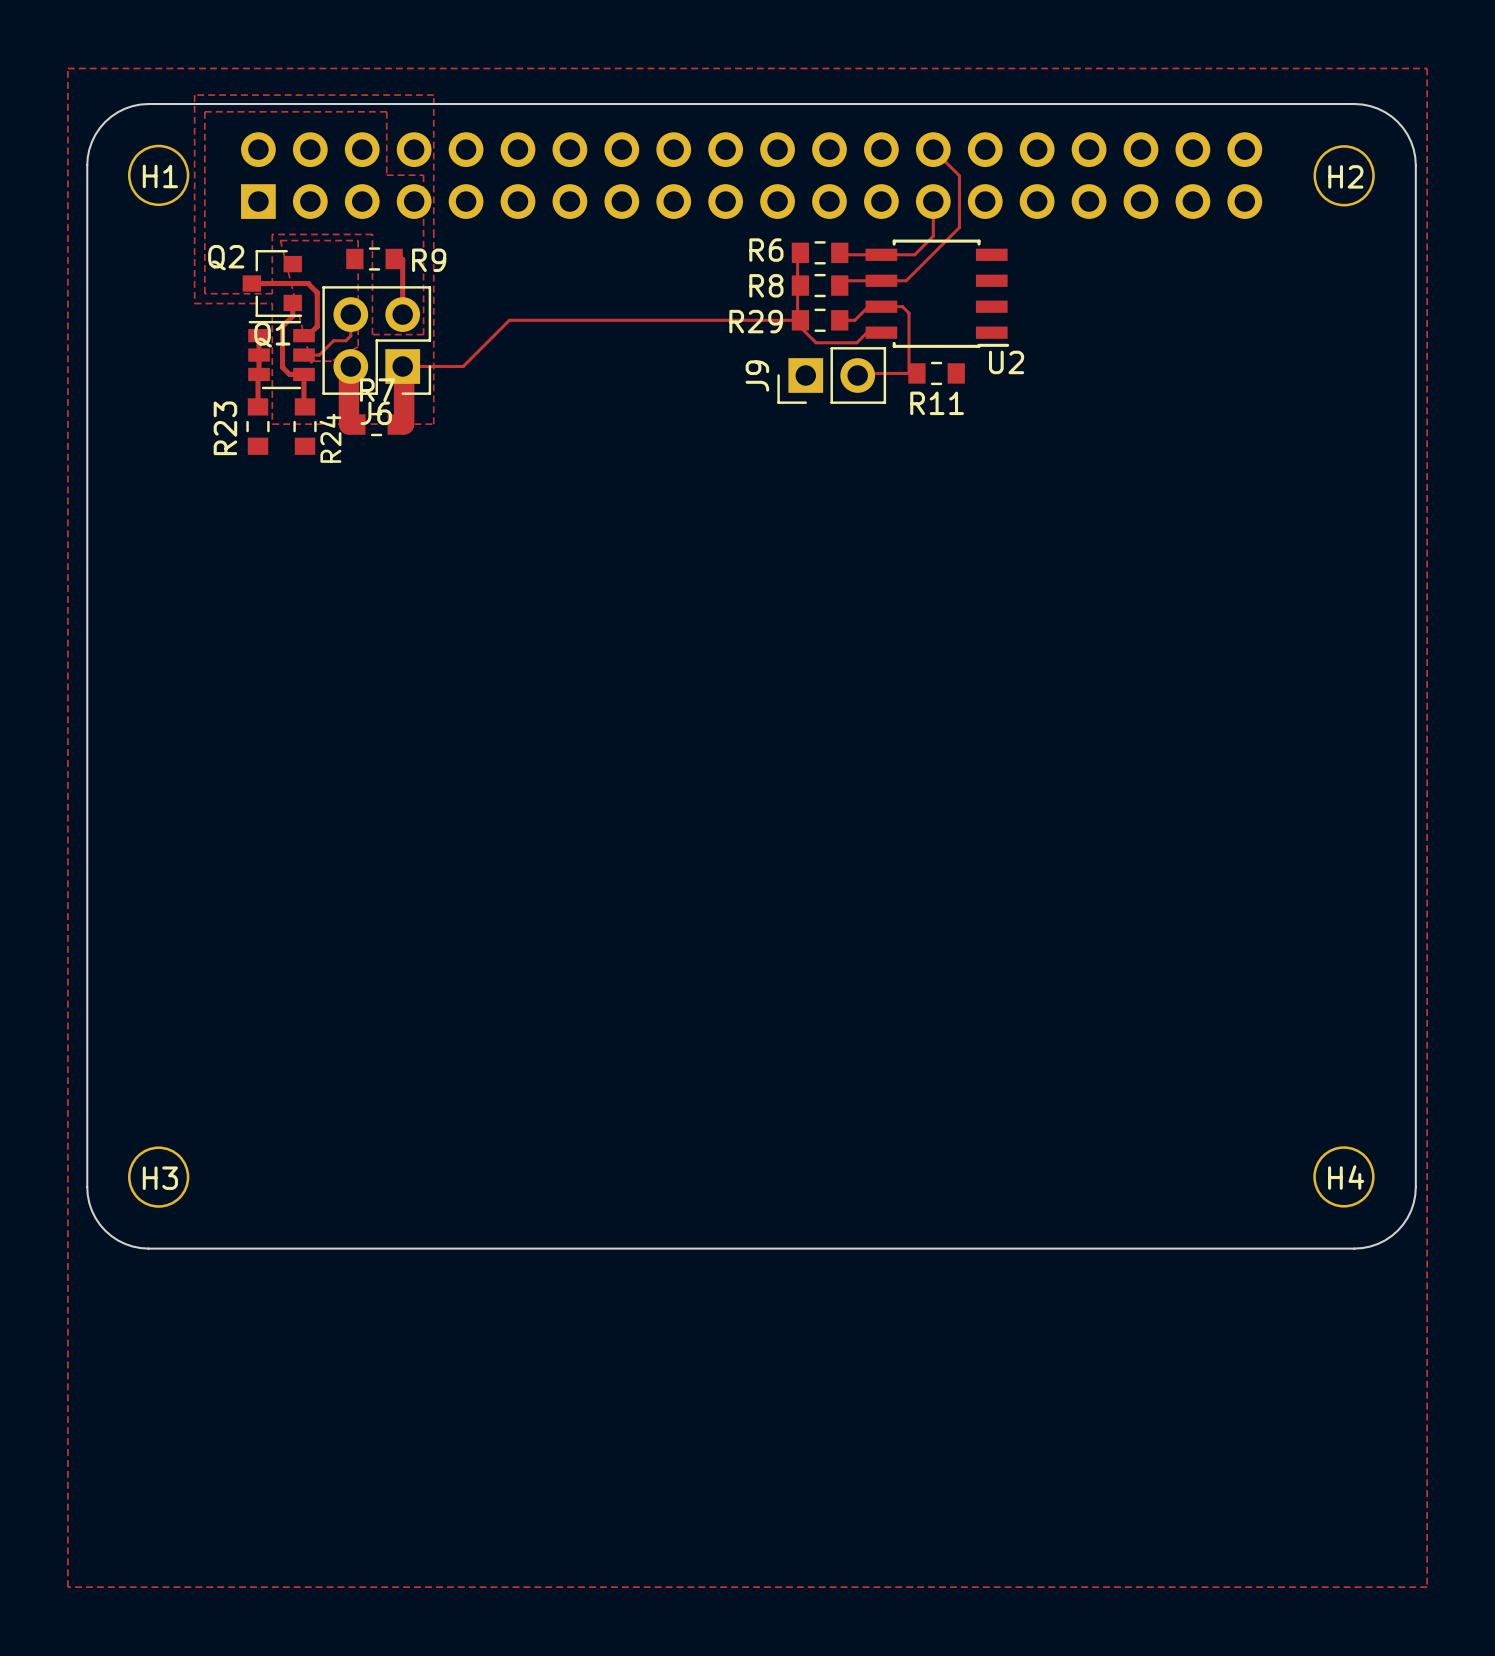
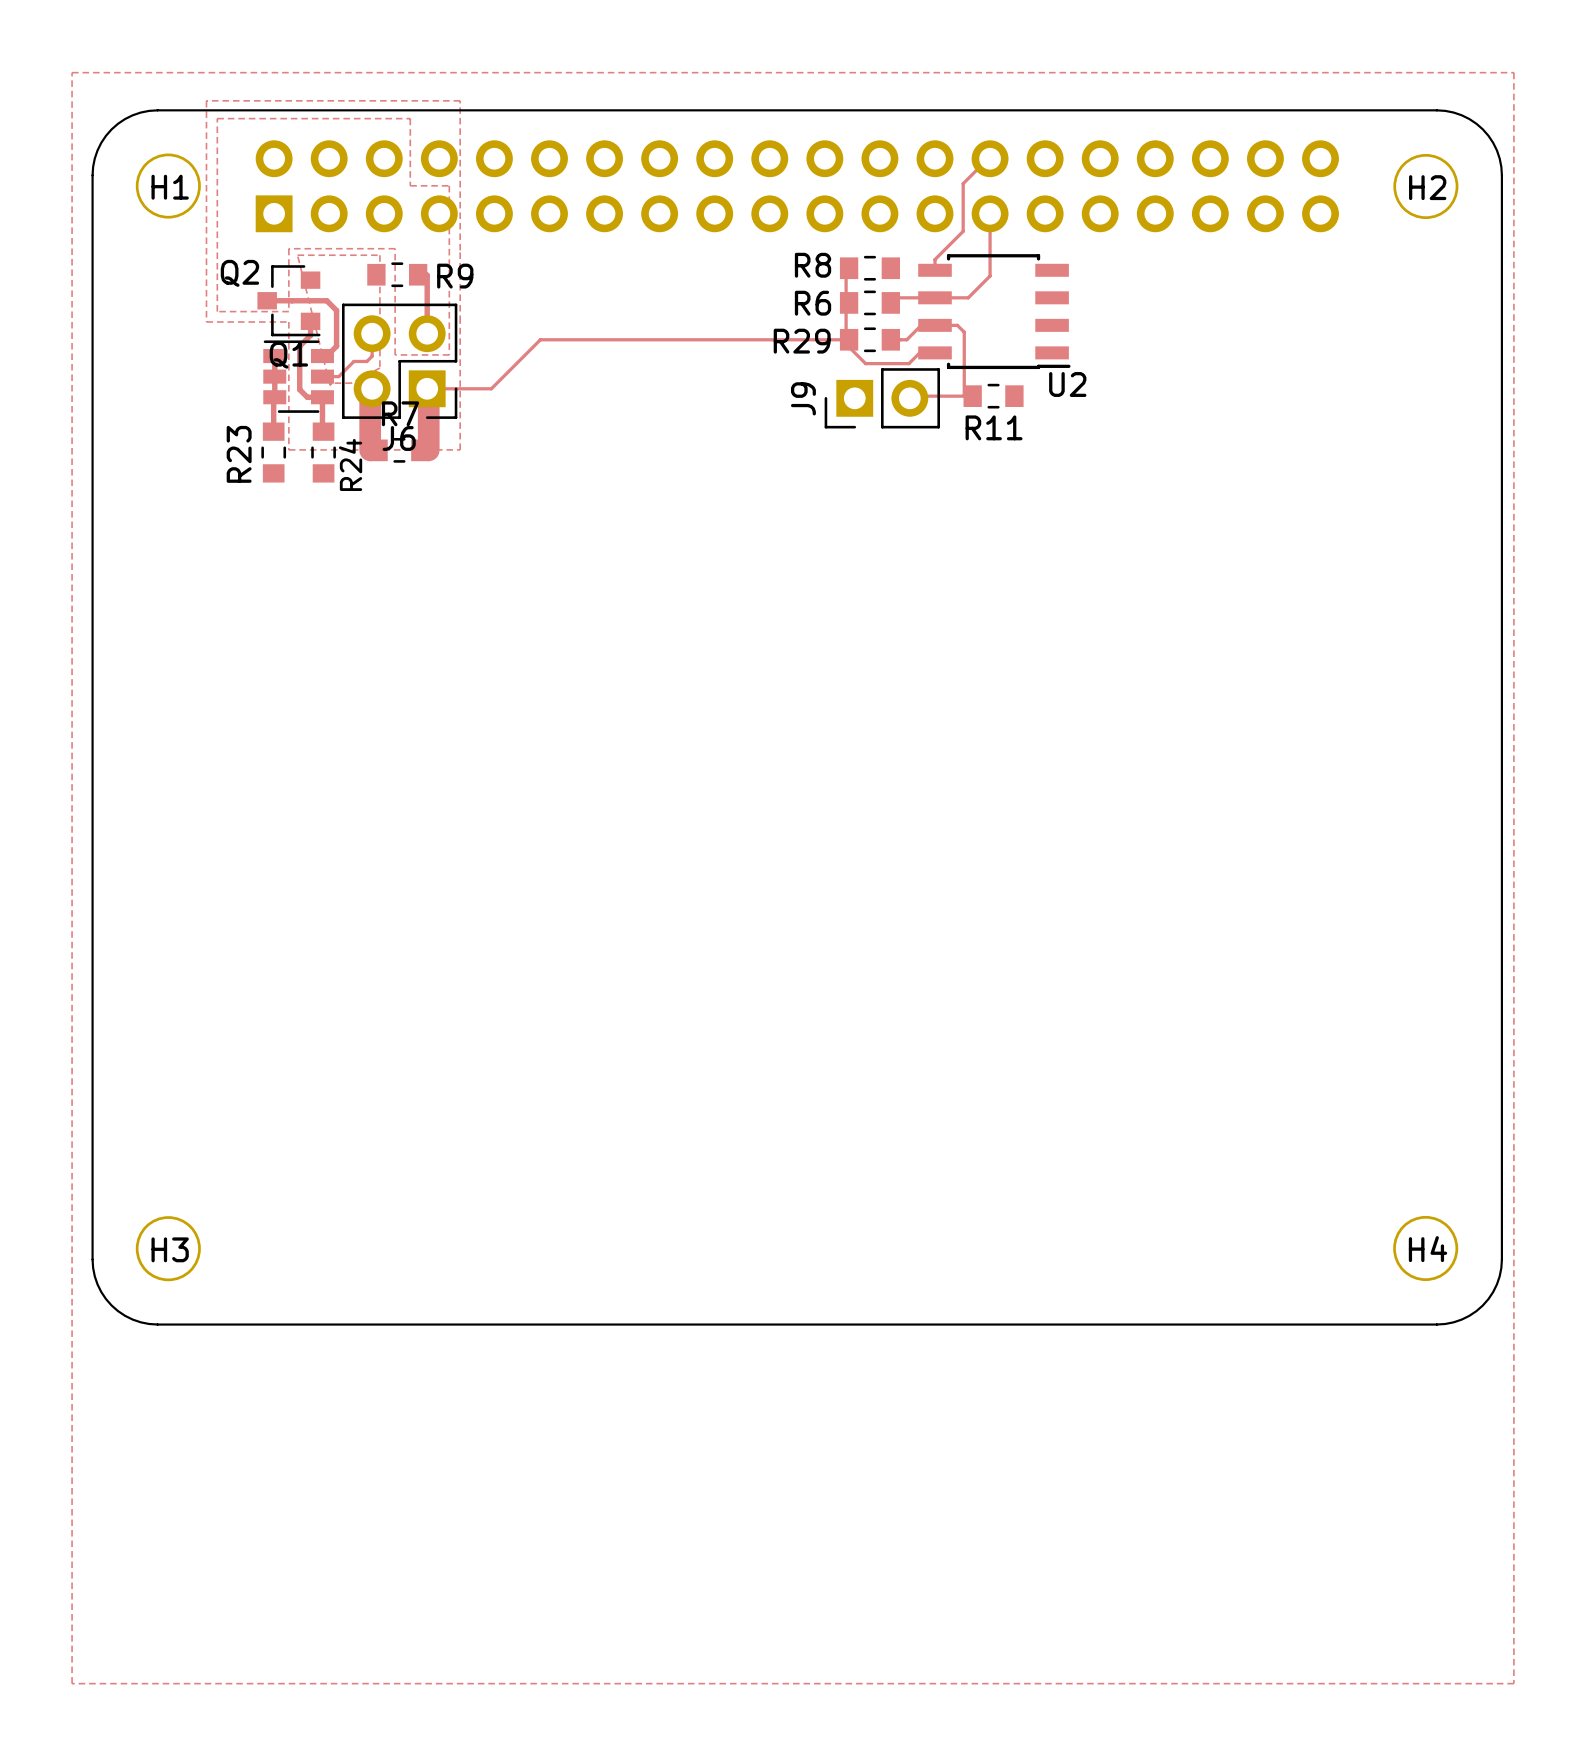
track: none -> (988, 158) (963, 183) (963, 231) (935, 259) (935, 270)
track: (933, 149) (959, 175) (959, 227) (906, 280) -> none
track: (933, 236) (914, 254) (841, 254) (839, 252) -> (990, 250) (990, 276) (968, 297) (961, 297)
R6 name: R6 (766, 250) -> R8 (813, 265)
R8 name: R8 (766, 285) -> R6 (813, 303)

